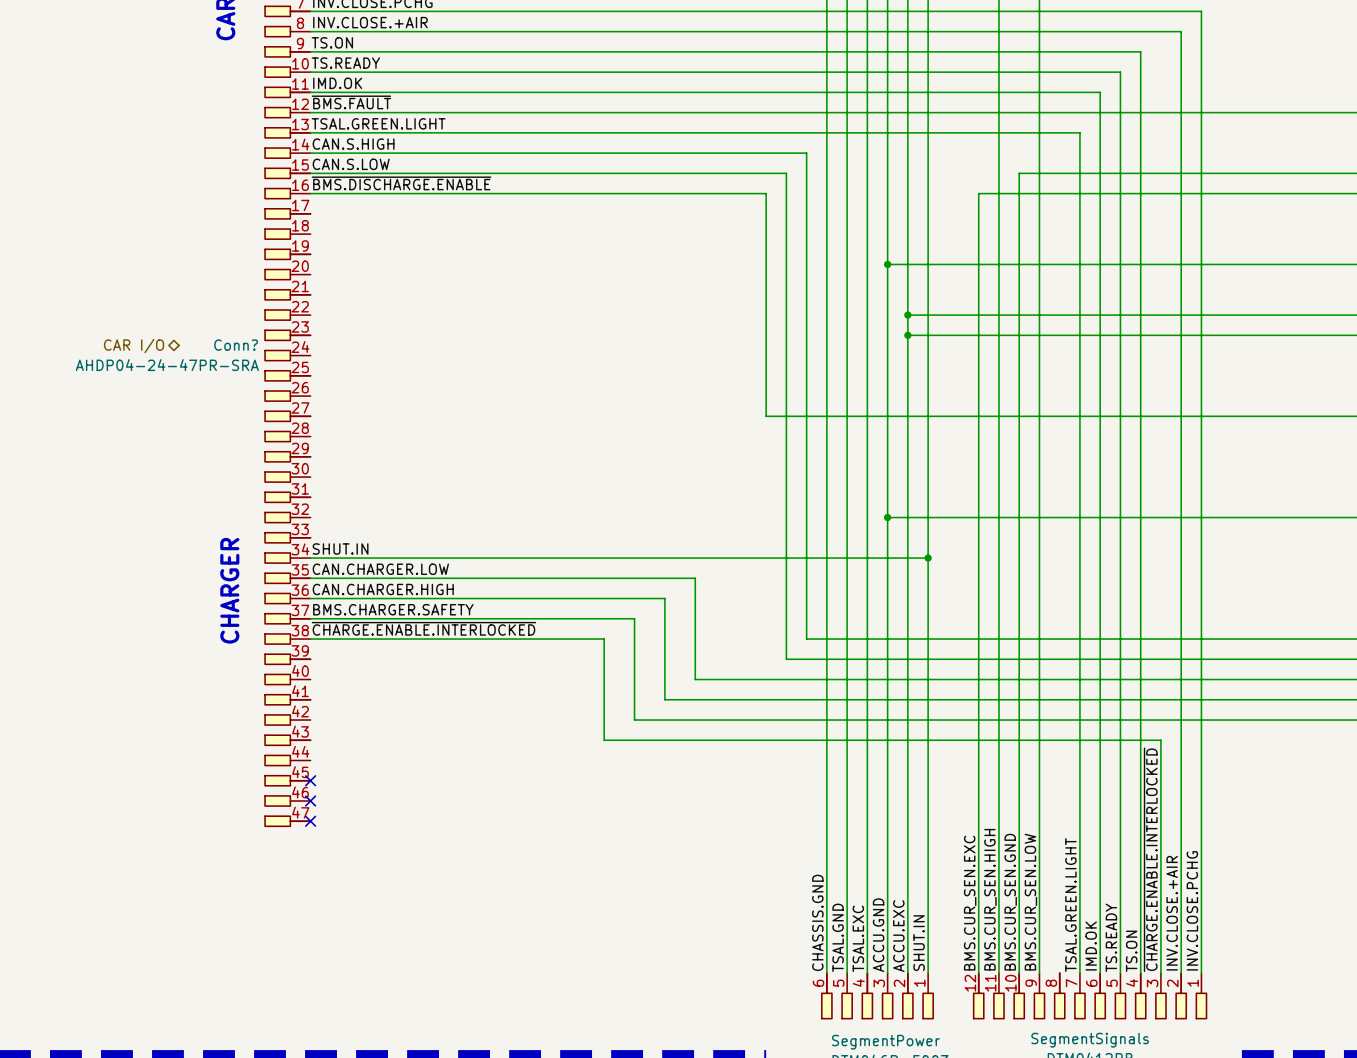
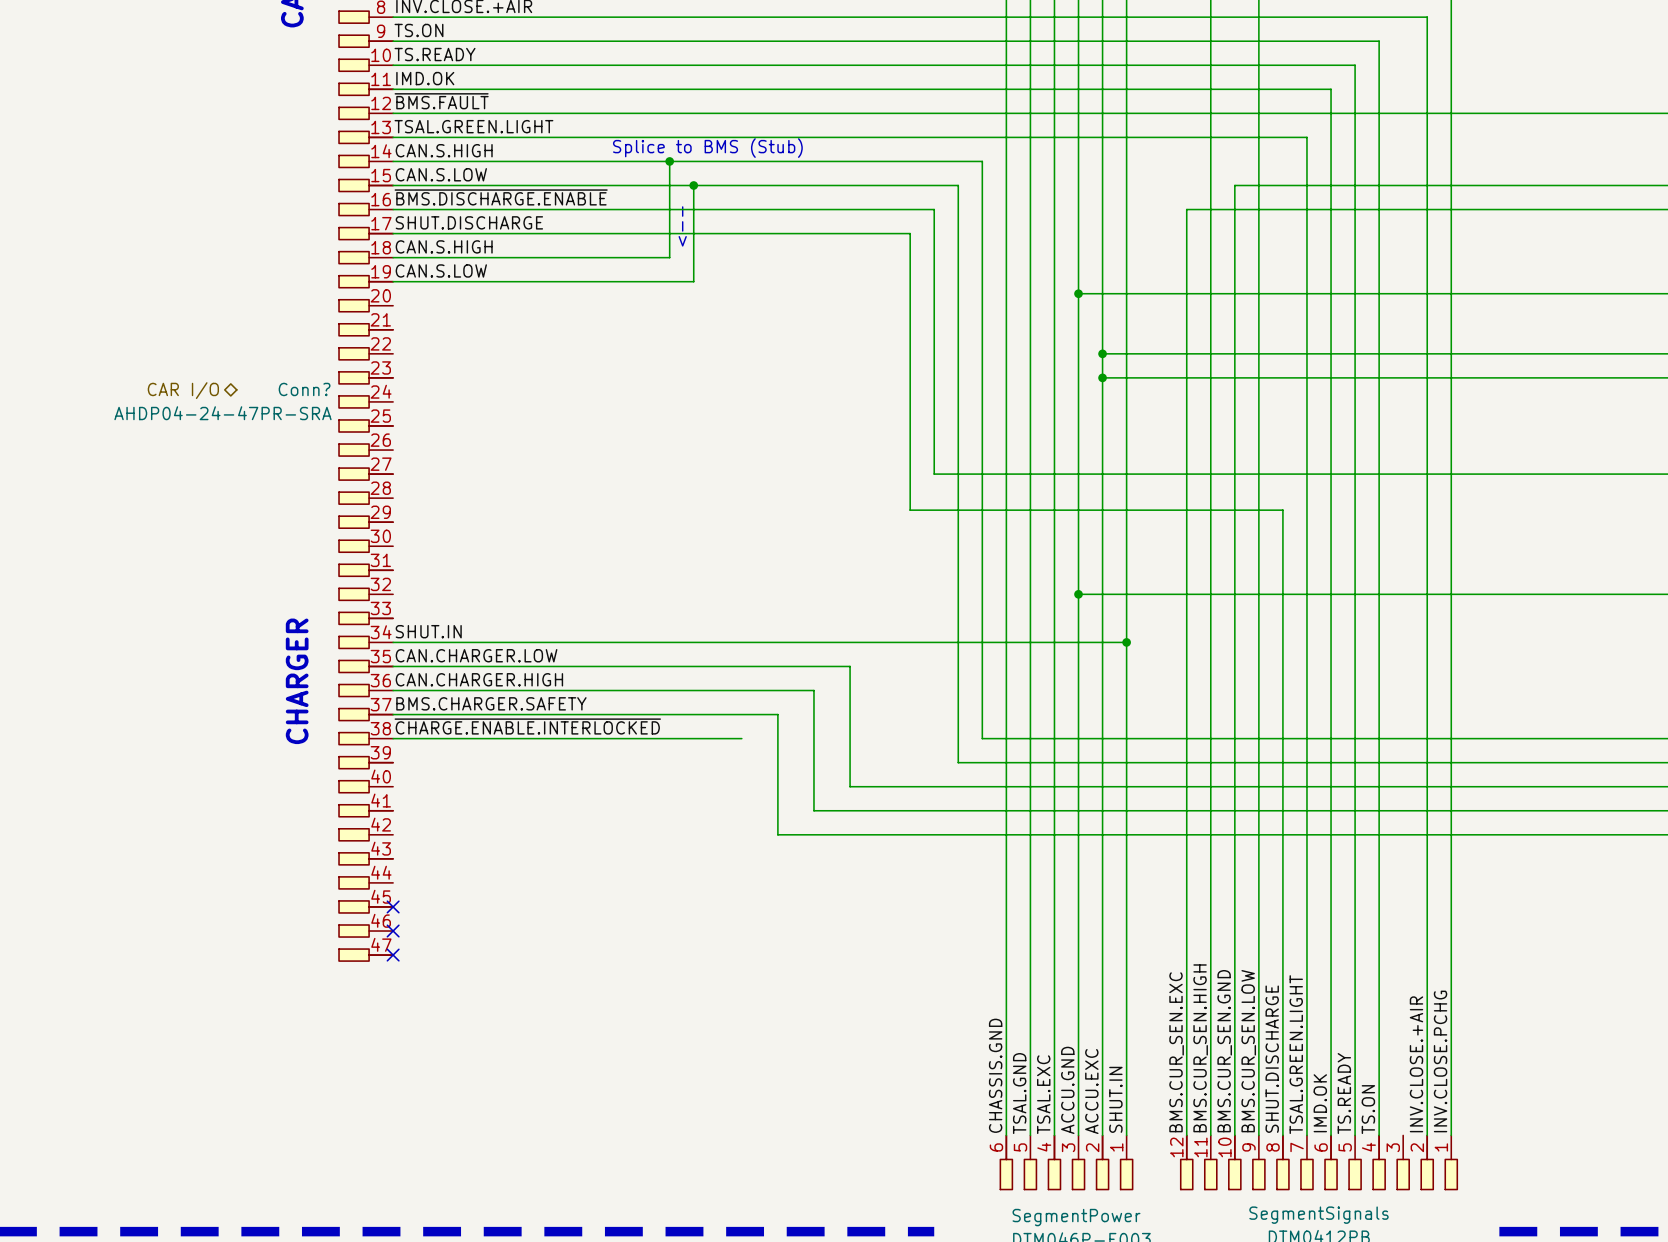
text: none -> Splice to BMS (Stub) (707, 148)
wire: none -> (669, 161) (669, 257) (393, 257)
junction: none -> (669, 161)
wire: none -> (693, 185) (693, 281) (393, 281)
junction: none -> (693, 185)
label: none -> SHUT.DISCHARGE (469, 222)
text: none -> <-- (682, 226)
wire: none -> (393, 233) (910, 233) (910, 510) (1282, 510) (1282, 1135)
label: none -> CAN.S.HIGH (444, 246)
label: none -> CAN.S.LOW (441, 270)
wire: (604, 639) (604, 740) (1160, 740) (1160, 973) -> none
label: ~{CHARGE.ENABLE.INTERLOCKED} (1150, 859) -> none
label: none -> SHUT.DISCHARGE (1272, 1059)

